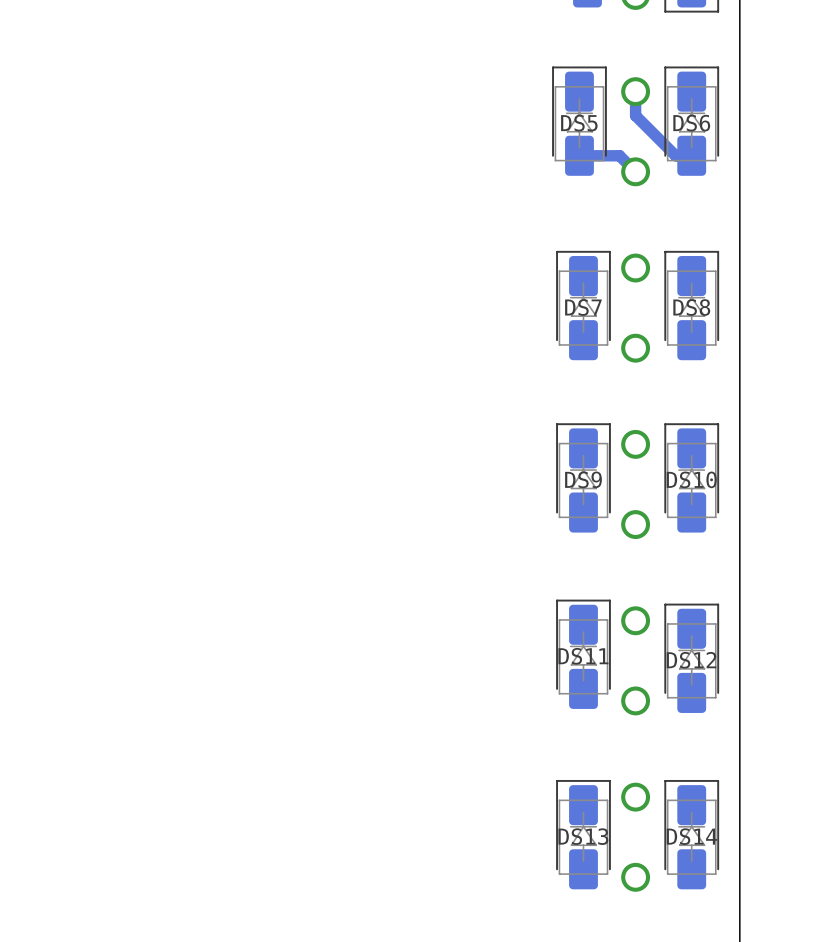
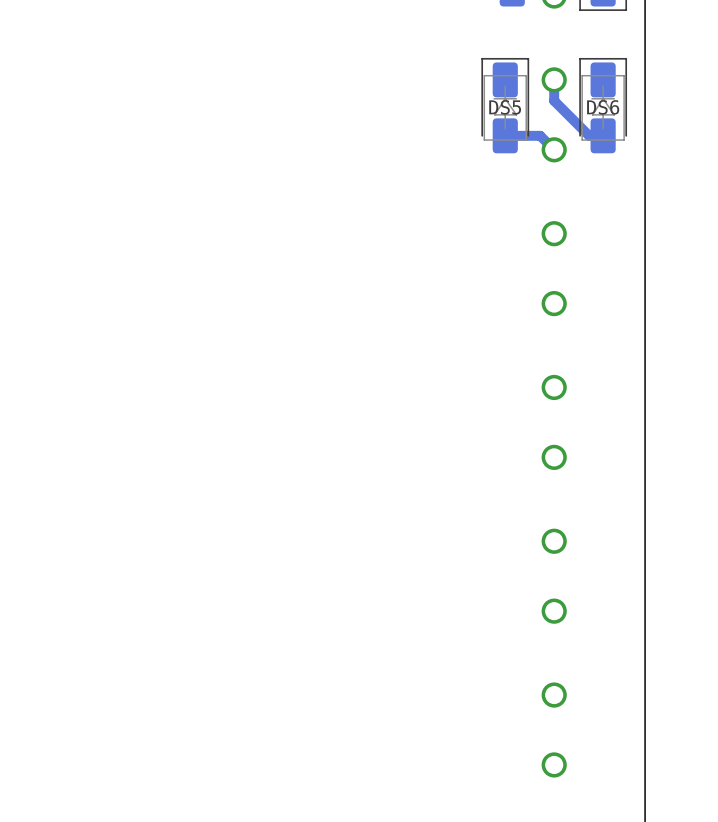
DS7: (583, 305) -> none
DS8: (691, 305) -> none
DS9: (583, 477) -> none
DS10: (691, 477) -> none
DS11: (583, 654) -> none
DS12: (691, 658) -> none
DS13: (583, 834) -> none
DS14: (691, 834) -> none

